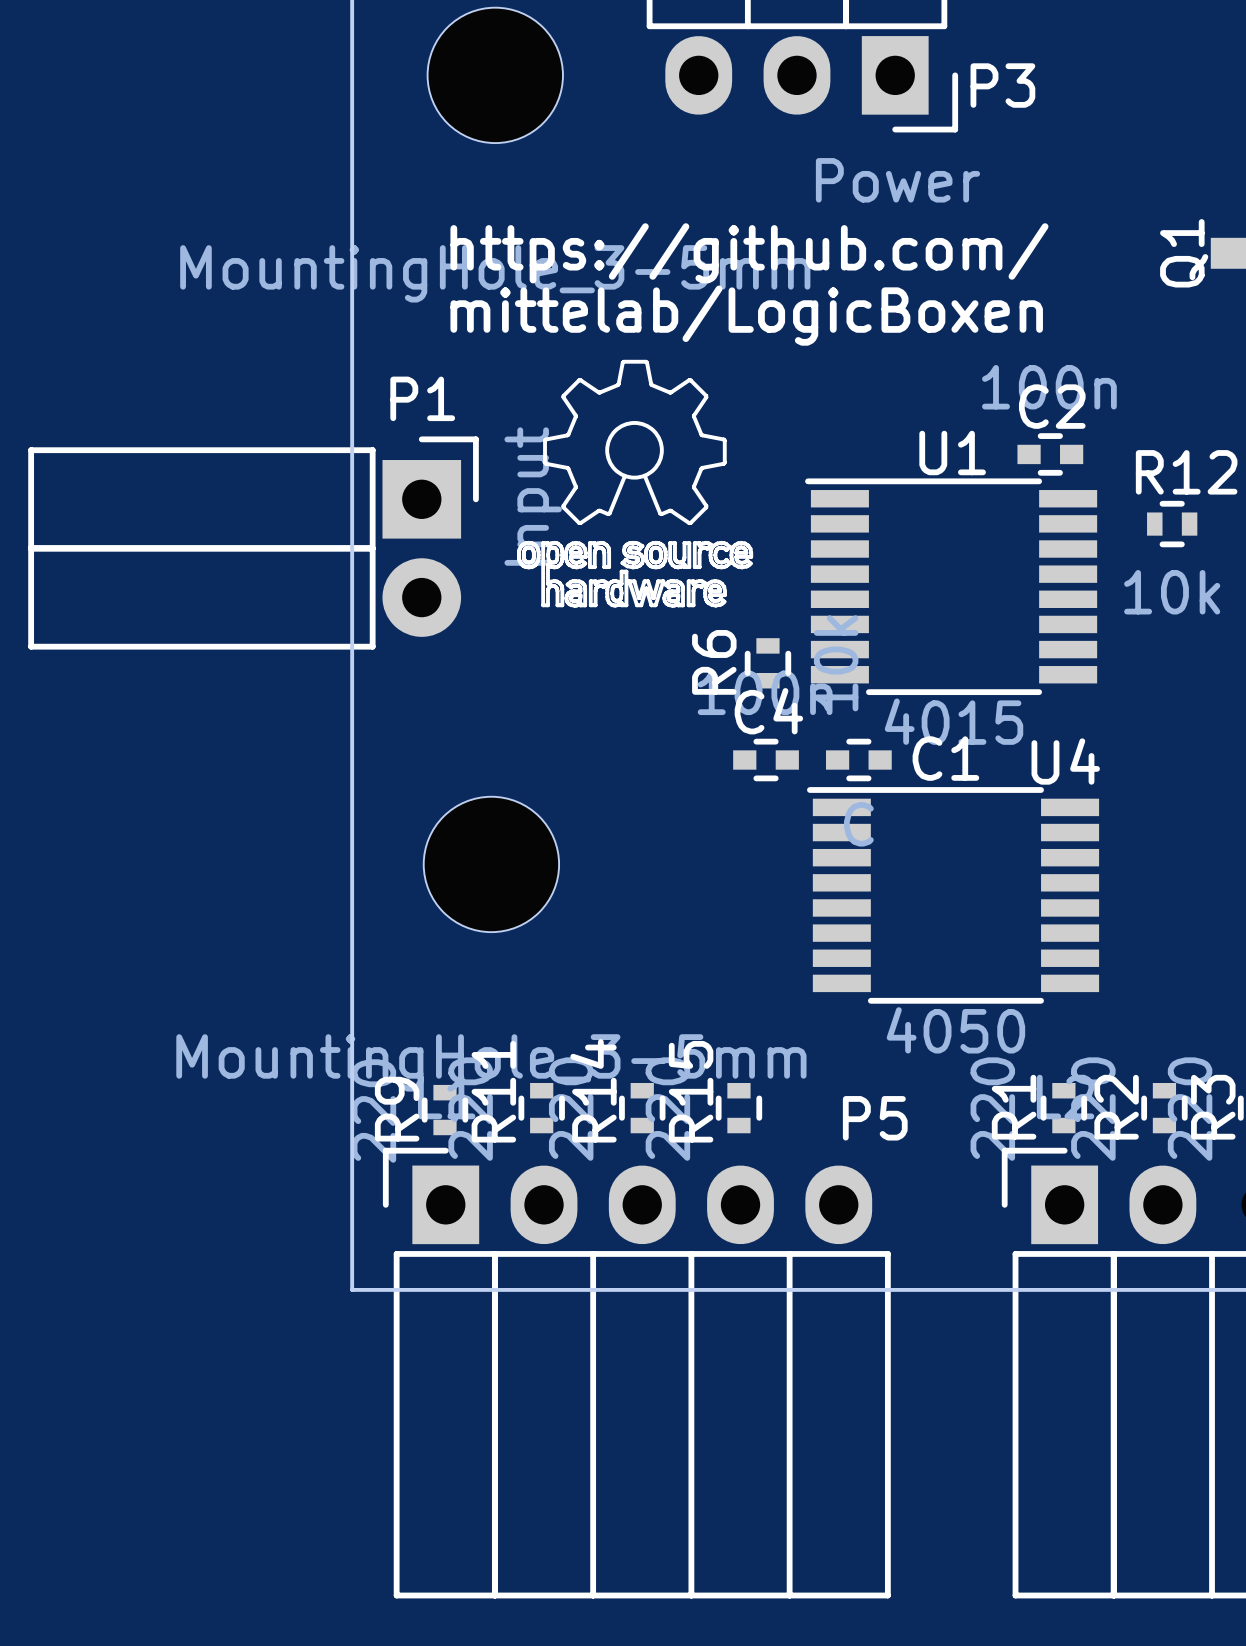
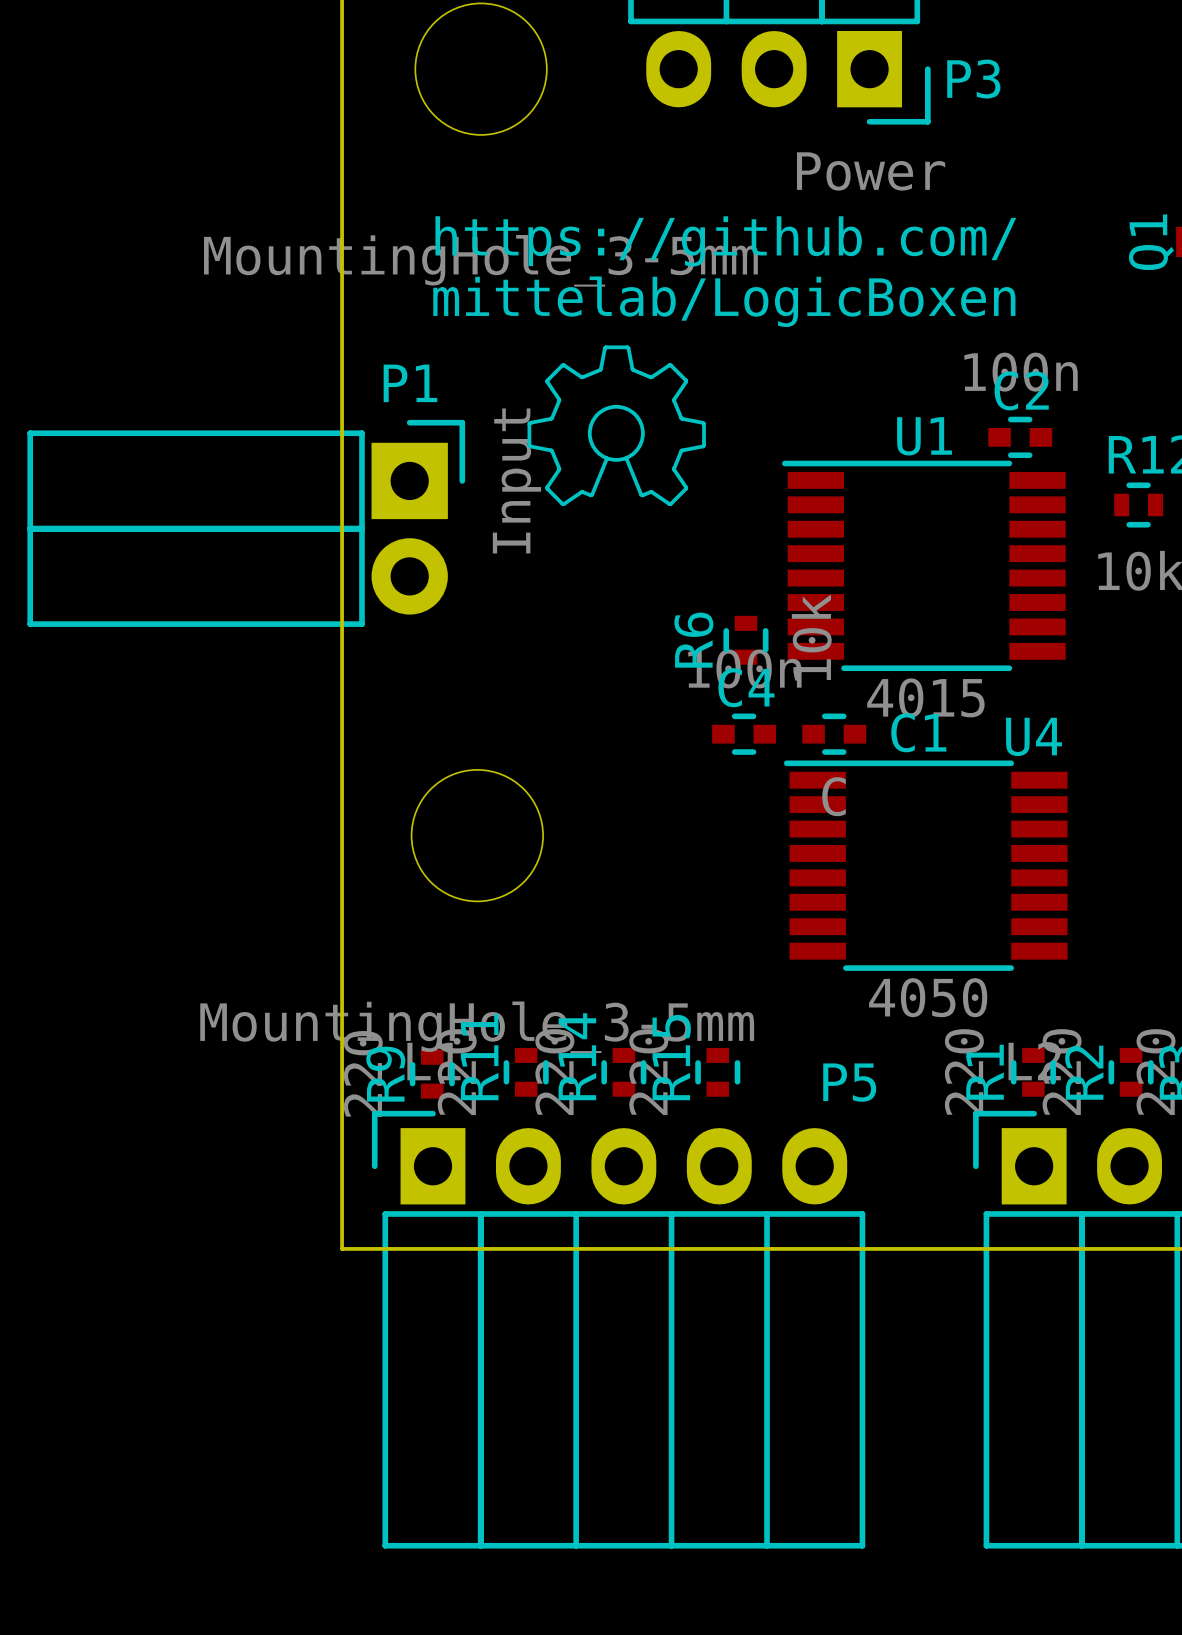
line: (528, 542) (536, 545) (538, 555) (536, 564) (528, 567) (521, 564) (518, 555) (521, 545) (528, 542) -> none
line: (575, 542) (582, 545) (585, 552) (585, 556) (570, 556) (574, 562) (581, 560) (585, 563) (576, 567) (567, 563) (565, 555) (567, 547) (575, 542) -> none
line: (601, 542) (608, 547) (609, 567) (604, 567) (603, 550) (599, 547) (595, 550) (594, 567) (589, 567) (589, 543) (594, 543) (594, 545) (601, 542) -> none
line: (633, 542) (642, 546) (639, 549) (631, 547) (629, 551) (639, 553) (642, 559) (640, 565) (633, 567) (622, 563) (625, 559) (633, 562) (637, 561) (637, 558) (628, 556) (624, 552) (626, 544) (633, 542) -> none
line: (655, 542) (663, 545) (665, 555) (663, 564) (655, 567) (648, 564) (645, 555) (648, 545) (655, 542) -> none
line: (721, 542) (730, 546) (726, 550) (718, 548) (715, 551) (716, 560) (721, 562) (726, 560) (730, 563) (721, 567) (712, 562) (710, 555) (712, 547) (721, 542) -> none
line: (741, 542) (748, 545) (751, 552) (751, 556) (736, 556) (739, 562) (747, 560) (750, 563) (742, 567) (733, 563) (731, 555) (733, 547) (741, 542) -> none
line: (670, 543) (674, 543) (675, 559) (679, 562) (684, 559) (684, 543) (689, 543) (689, 567) (684, 567) (684, 564) (678, 567) (672, 565) (670, 560) (670, 543) -> none
line: (699, 545) (699, 543) (694, 543) (694, 567) (699, 567) (701, 548) (707, 548) (710, 544) (705, 542) (699, 545) -> none
line: (528, 547) (524, 549) (523, 555) (524, 560) (528, 562) (532, 560) (533, 555) (532, 549) (528, 547) -> none
line: (551, 547) (548, 550) (548, 560) (554, 562) (556, 560) (556, 549) (551, 547) -> none
line: (575, 547) (572, 548) (570, 552) (580, 552) (579, 548) (575, 547) -> none
line: (655, 547) (651, 549) (650, 555) (651, 560) (655, 562) (659, 560) (660, 555) (659, 549) (655, 547) -> none
line: (741, 547) (737, 548) (736, 552) (746, 552) (744, 548) (741, 547) -> none
line: (621, 571) (626, 571) (626, 605) (621, 605) (621, 602) (613, 605) (607, 599) (607, 587) (613, 581) (621, 583) (621, 571) -> none
line: (575, 581) (584, 585) (585, 605) (580, 605) (580, 603) (571, 605) (566, 601) (568, 593) (580, 591) (579, 586) (571, 587) (567, 584) (575, 581) -> none
line: (673, 581) (682, 585) (683, 605) (678, 605) (678, 603) (668, 605) (664, 601) (666, 593) (678, 591) (677, 586) (669, 587) (665, 584) (673, 581) -> none
line: (715, 581) (721, 583) (724, 591) (724, 595) (709, 595) (713, 600) (720, 598) (724, 601) (715, 605) (707, 601) (705, 593) (706, 585) (715, 581) -> none
line: (547, 583) (547, 564) (556, 567) (561, 561) (561, 548) (556, 543) (547, 545) (547, 543) (543, 543) (543, 605) (547, 605) (548, 588) (552, 585) (557, 588) (557, 605) (562, 605) (561, 585) (554, 581) (548, 583) -> none
line: (595, 583) (595, 581) (590, 581) (590, 605) (595, 605) (597, 587) (603, 587) (606, 582) (601, 581) (595, 583) -> none
line: (693, 583) (693, 581) (688, 581) (688, 605) (693, 605) (694, 587) (701, 587) (704, 582) (699, 581) (693, 583) -> none
line: (615, 585) (620, 588) (620, 598) (618, 600) (612, 598) (612, 588) (615, 585) -> none
line: (715, 585) (711, 587) (709, 591) (720, 591) (718, 587) (715, 585) -> none
line: (646, 588) (641, 605) (637, 605) (629, 581) (634, 581) (639, 598) (644, 581) (648, 581) (653, 598) (658, 581) (663, 581) (655, 605) (651, 605) (646, 588) -> none
line: (579, 599) (580, 595) (571, 596) (573, 600) (579, 600) -> none
line: (677, 599) (678, 595) (668, 596) (671, 600) (677, 600) -> none

